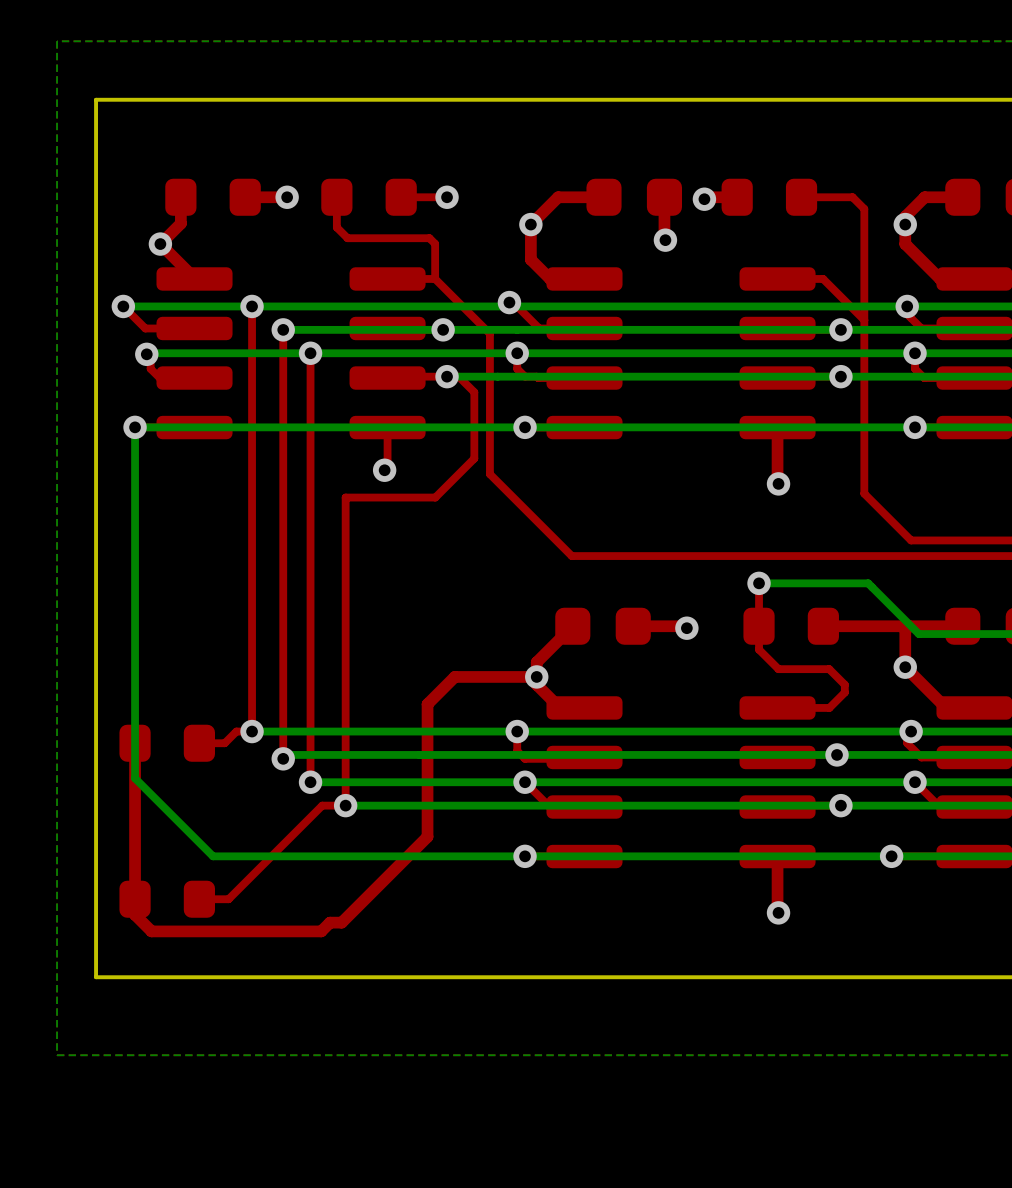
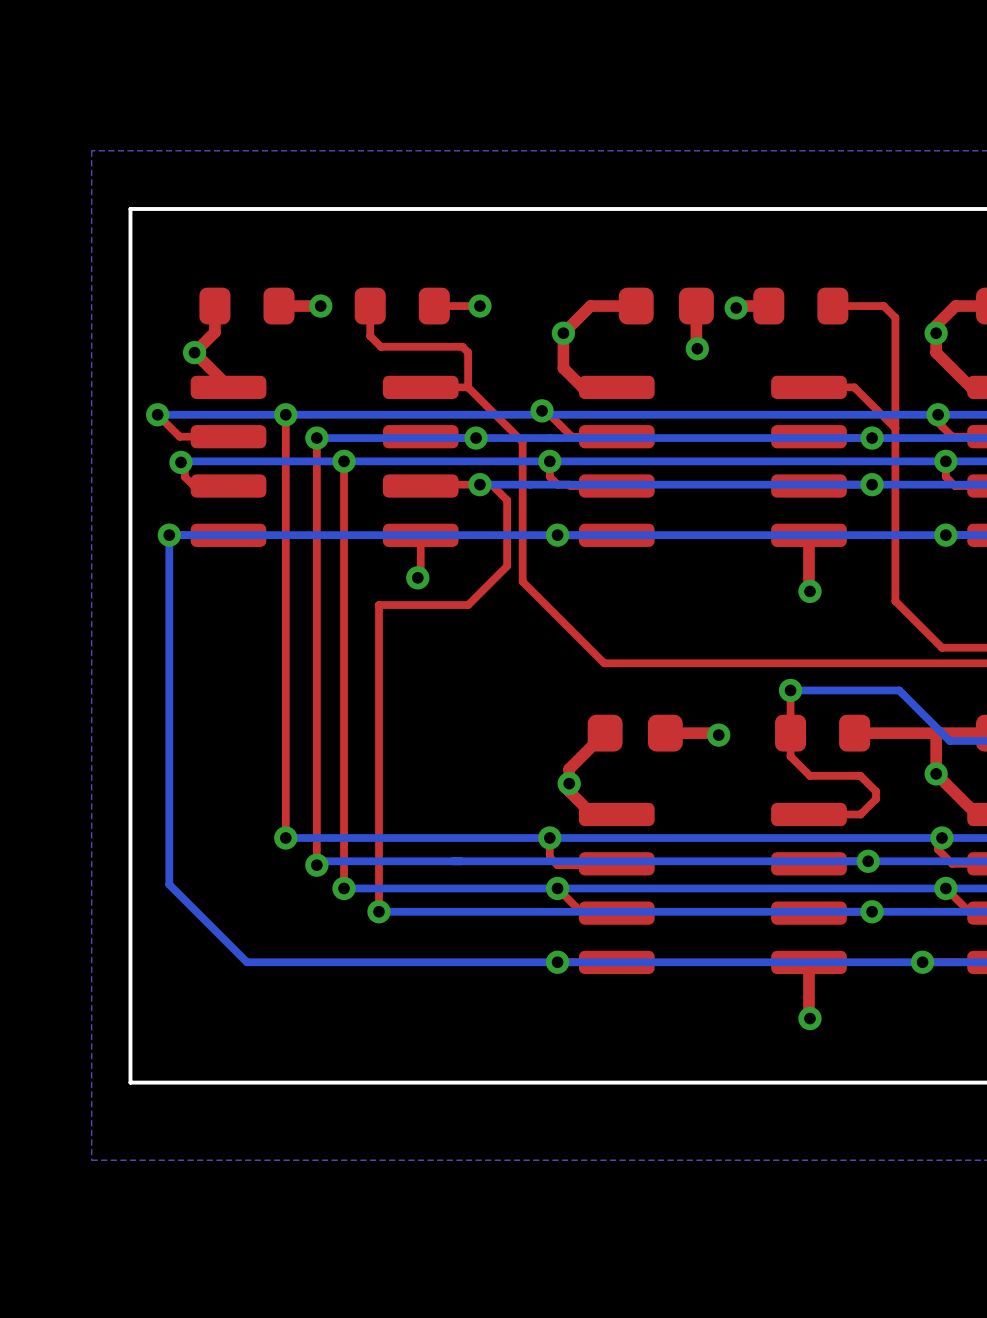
top track: (536, 676) (454, 676) (427, 704) (427, 836) (341, 922) (330, 922) (321, 931) (151, 931) (135, 914) (135, 743) -> none
top track: (252, 731) (236, 731) (224, 743) (199, 743) -> none
part: (167, 743) -> none
top track: (345, 805) (322, 805) (228, 899) (199, 899) -> none
part: (167, 899) -> none

